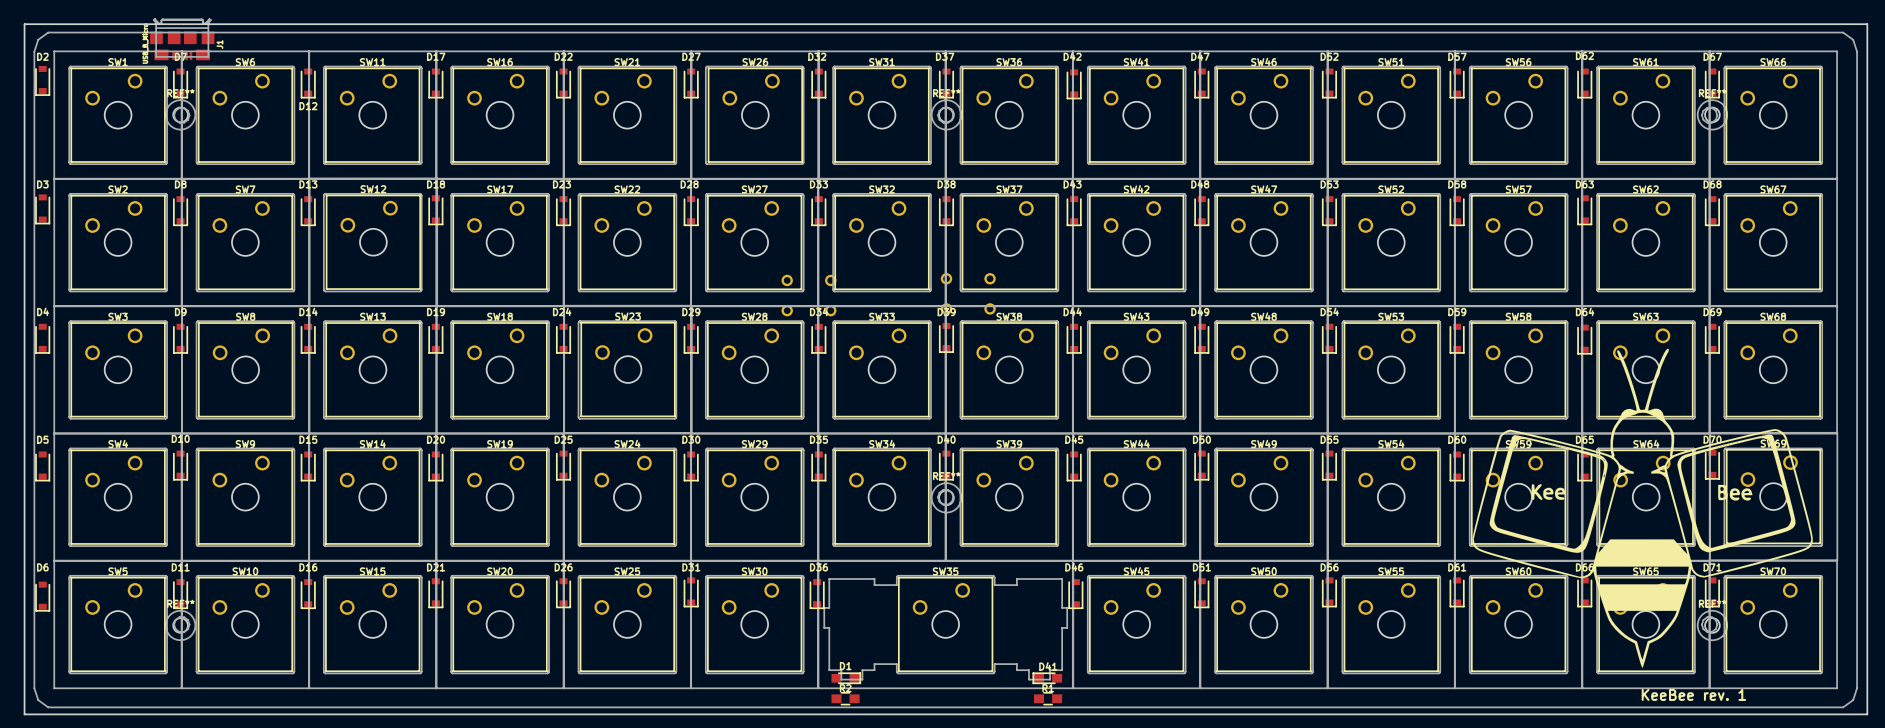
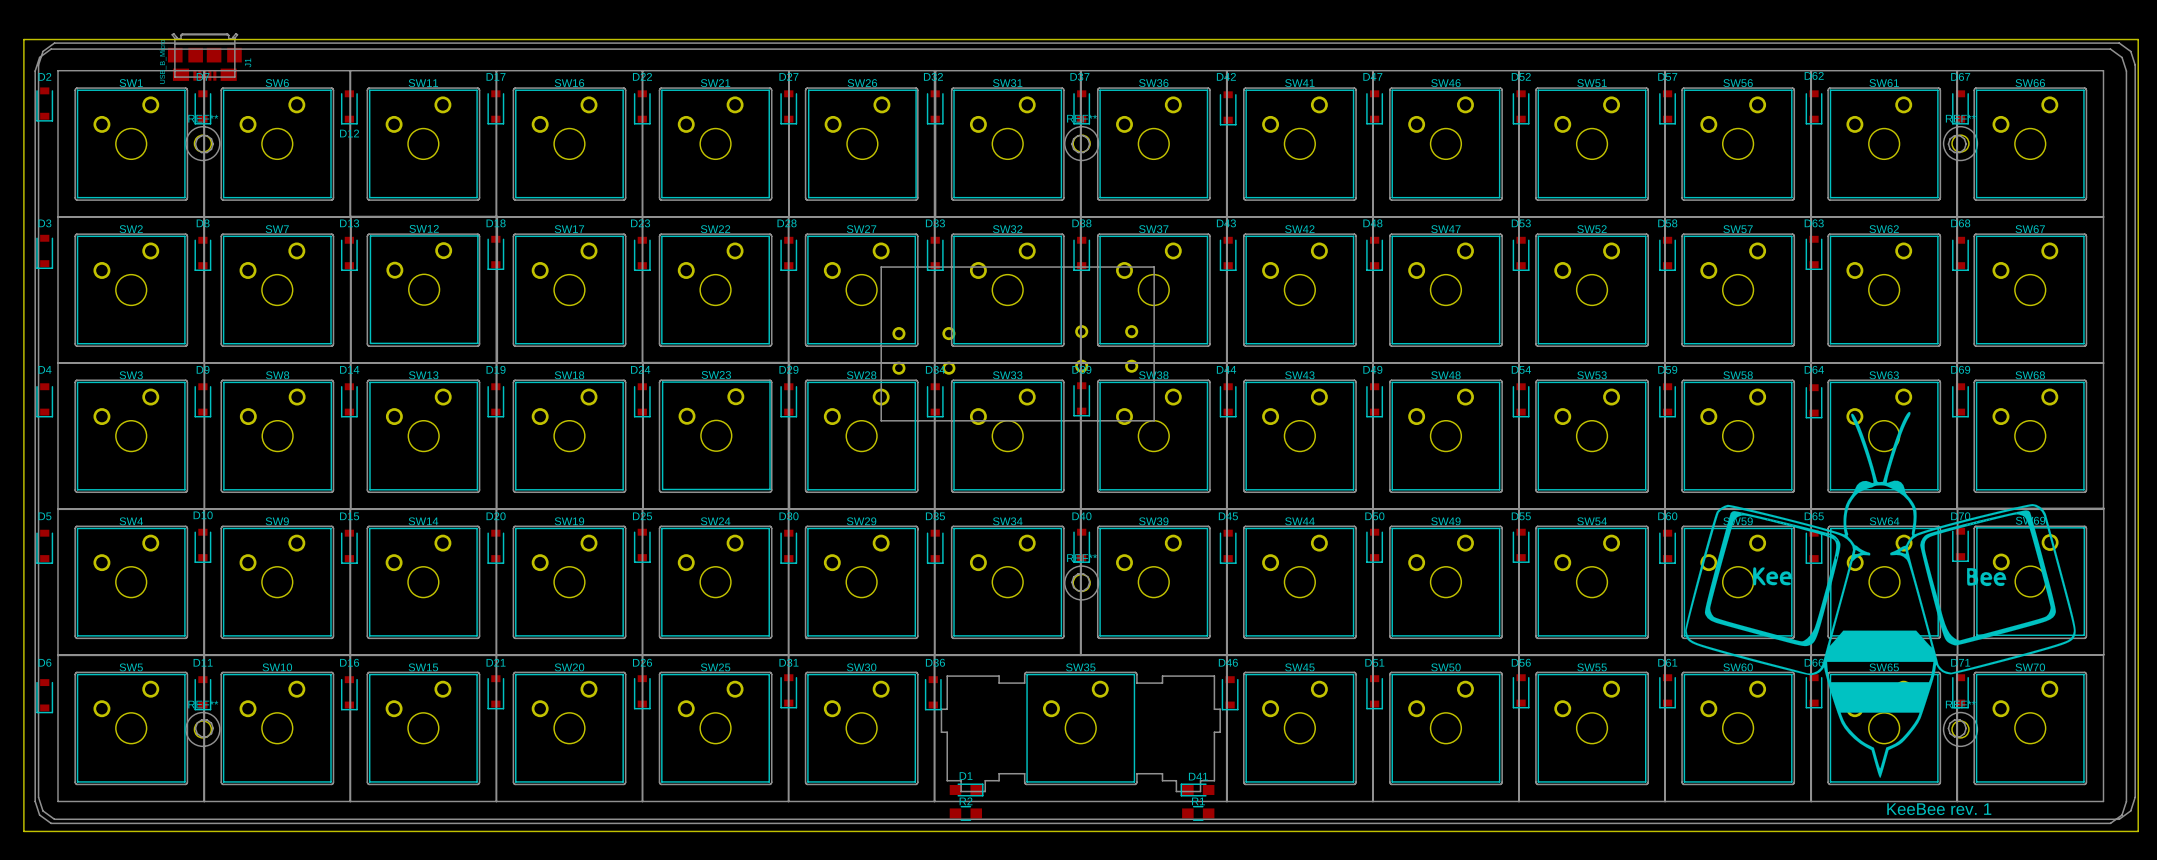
line: none -> (54, 43) (2119, 43) (2130, 51) (2135, 65) (2135, 797) (2130, 810) (2119, 819) (54, 819) (42, 810) (38, 797) (38, 65) (42, 51) (54, 43)
line: none -> (881, 267) (881, 420) (1154, 420) (1154, 267) (881, 267)

